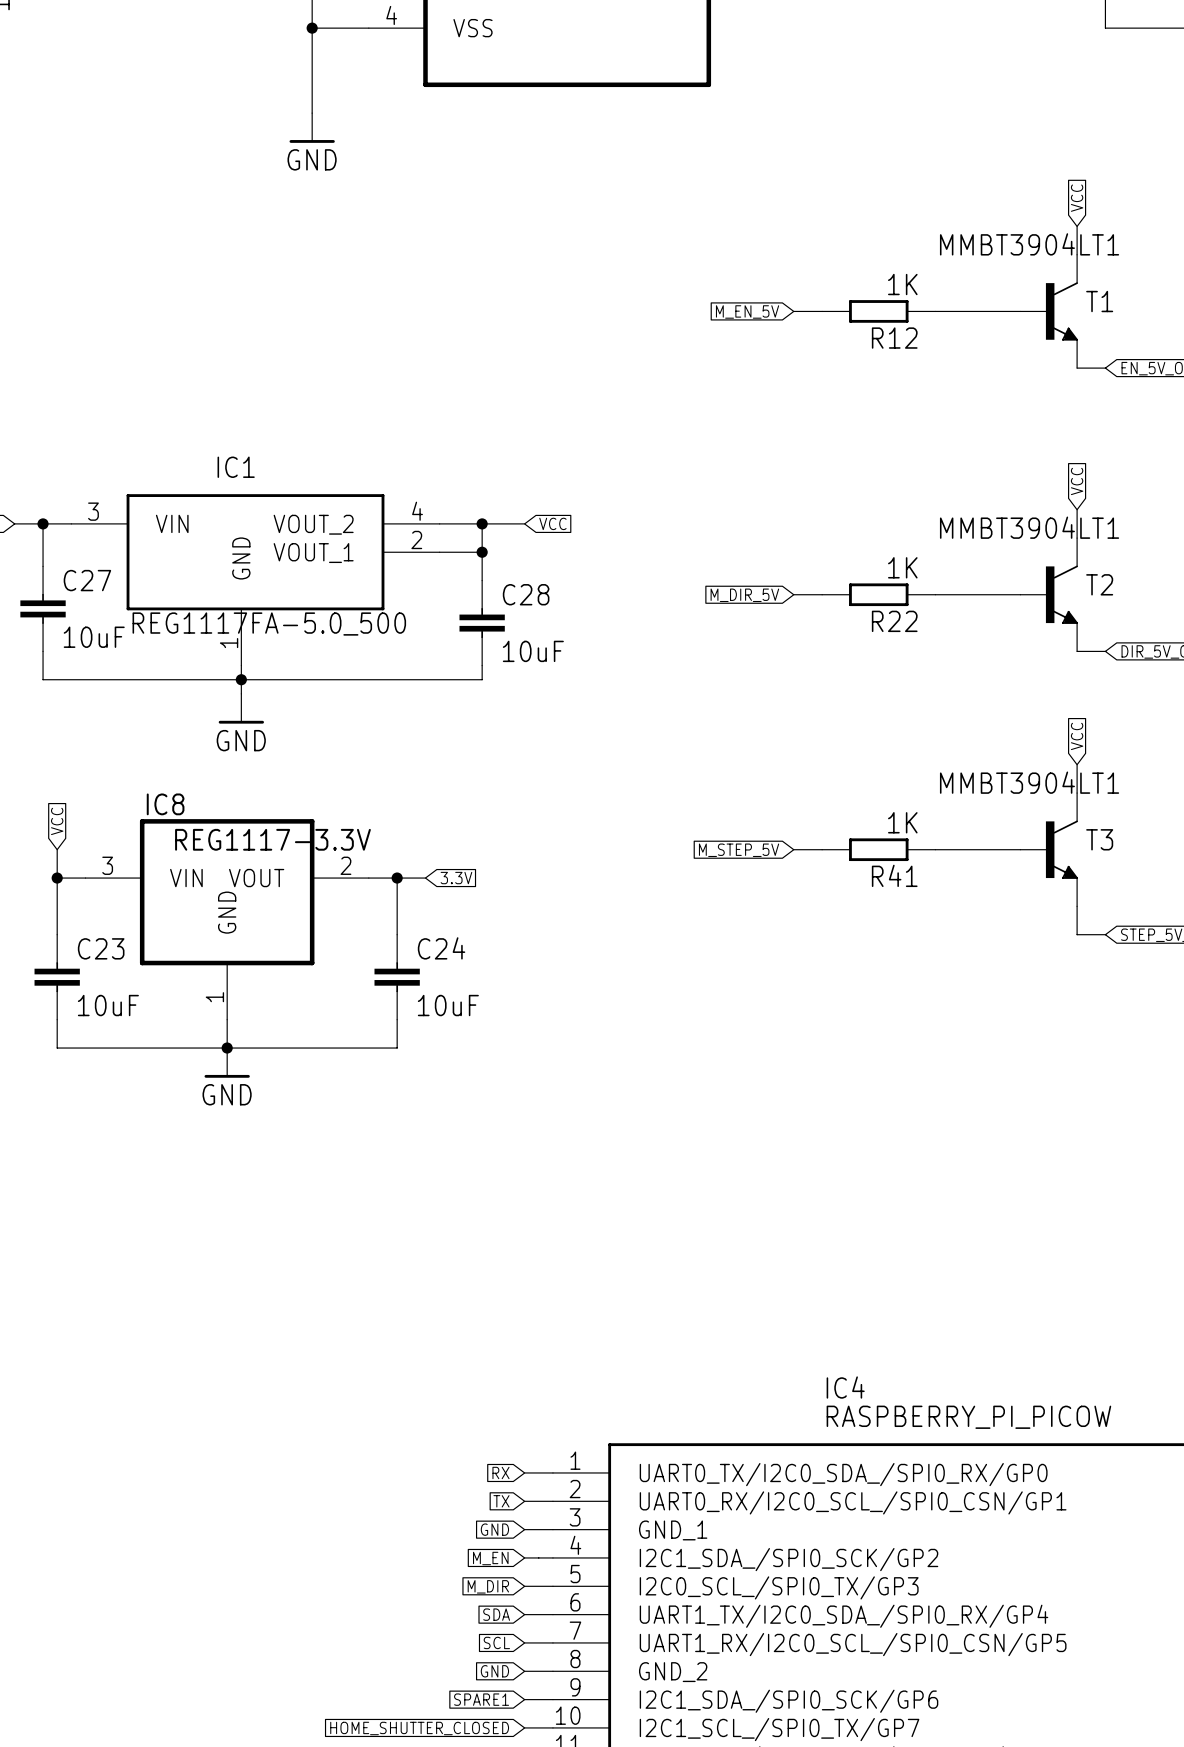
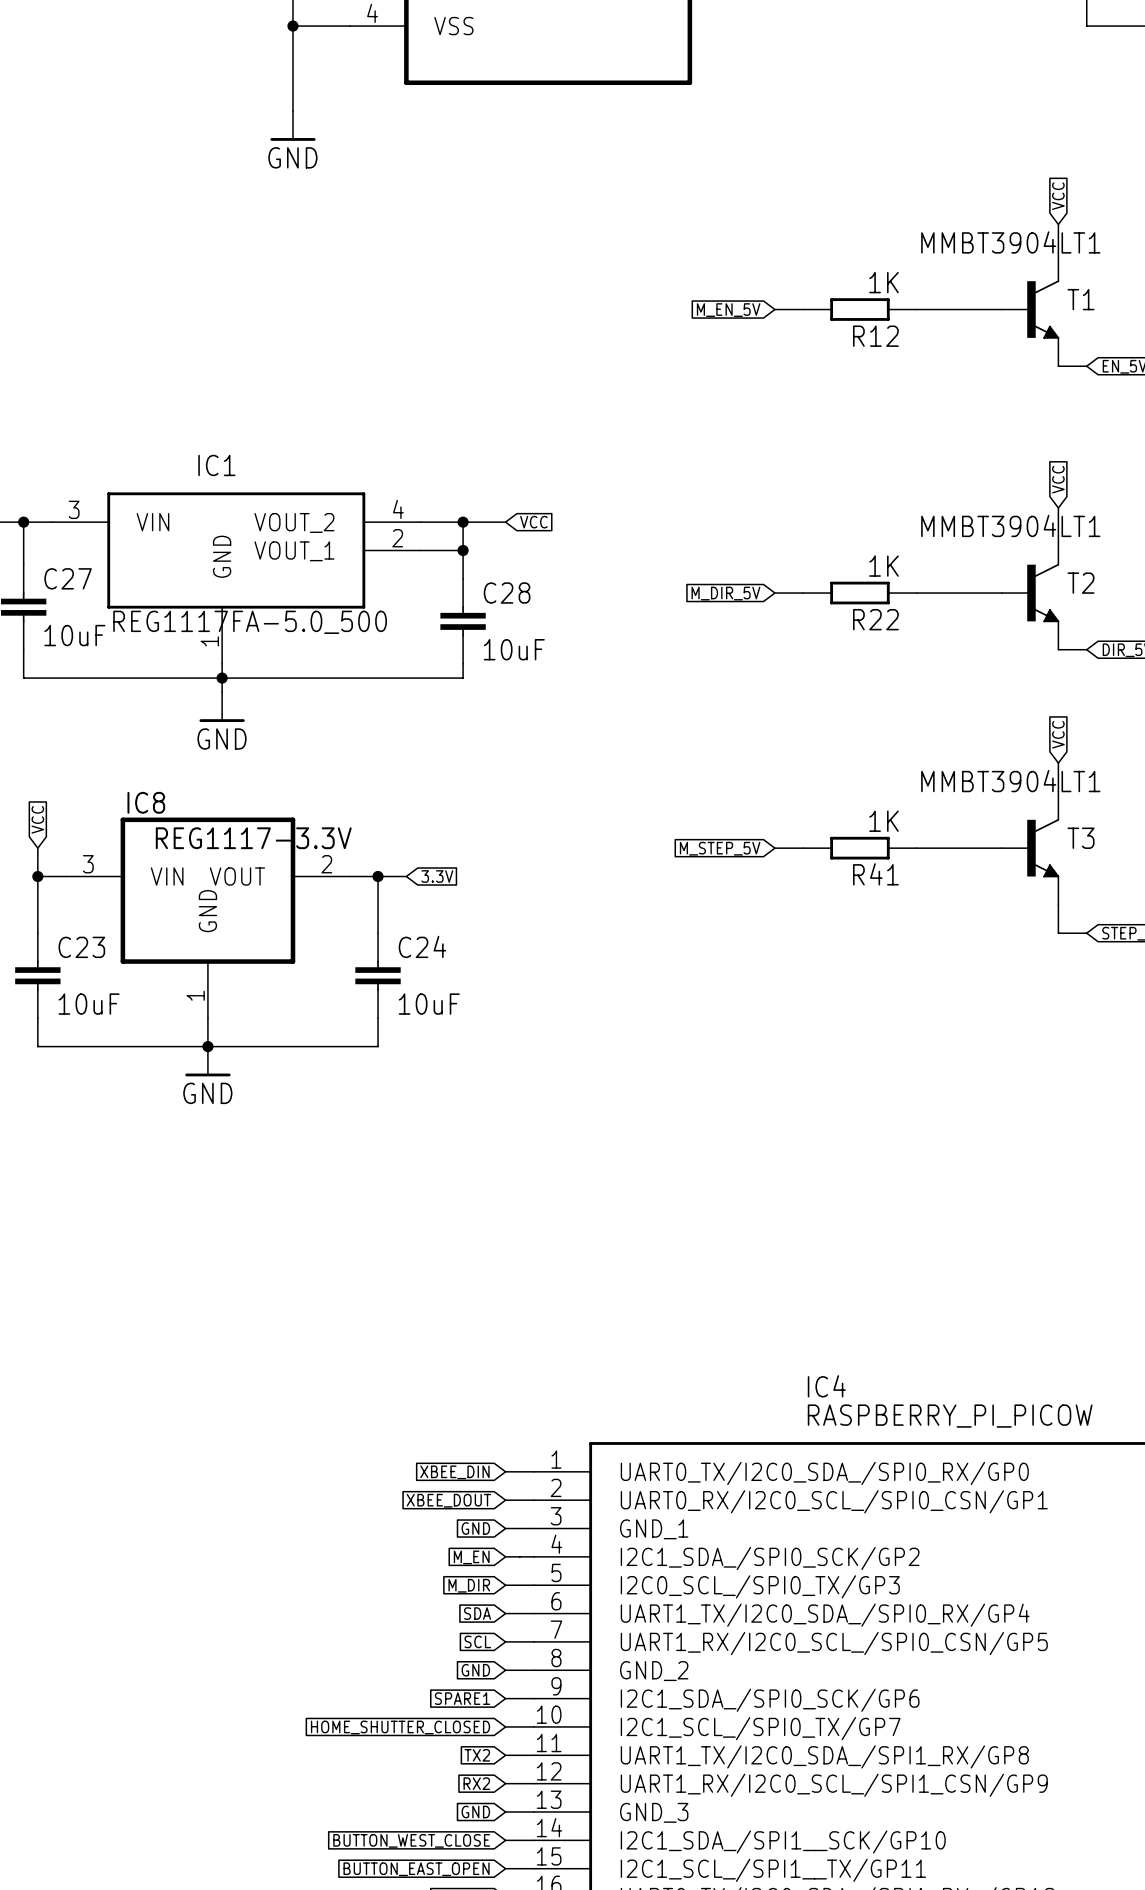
global label: RX (500, 1472) -> XBEE_DIN (454, 1472)
global label: TX (501, 1501) -> XBEE_DOUT (448, 1500)

